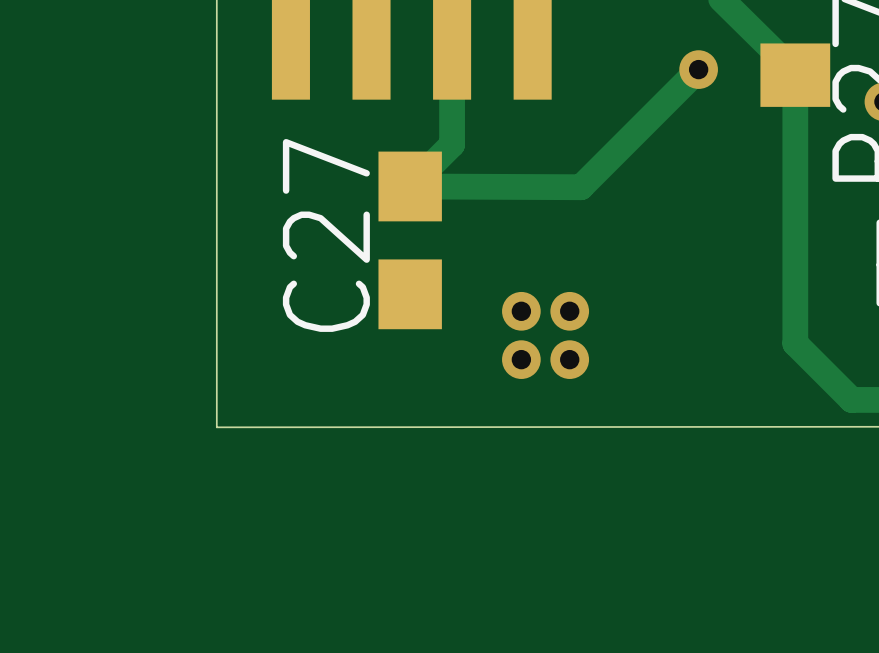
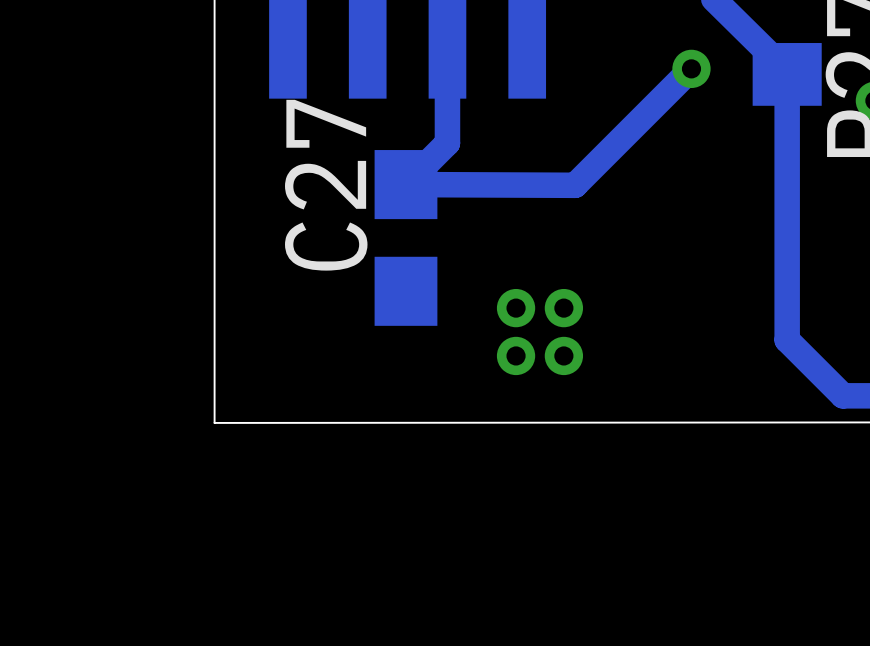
C27 name position: C27 (326, 235) -> C27 (326, 185)

